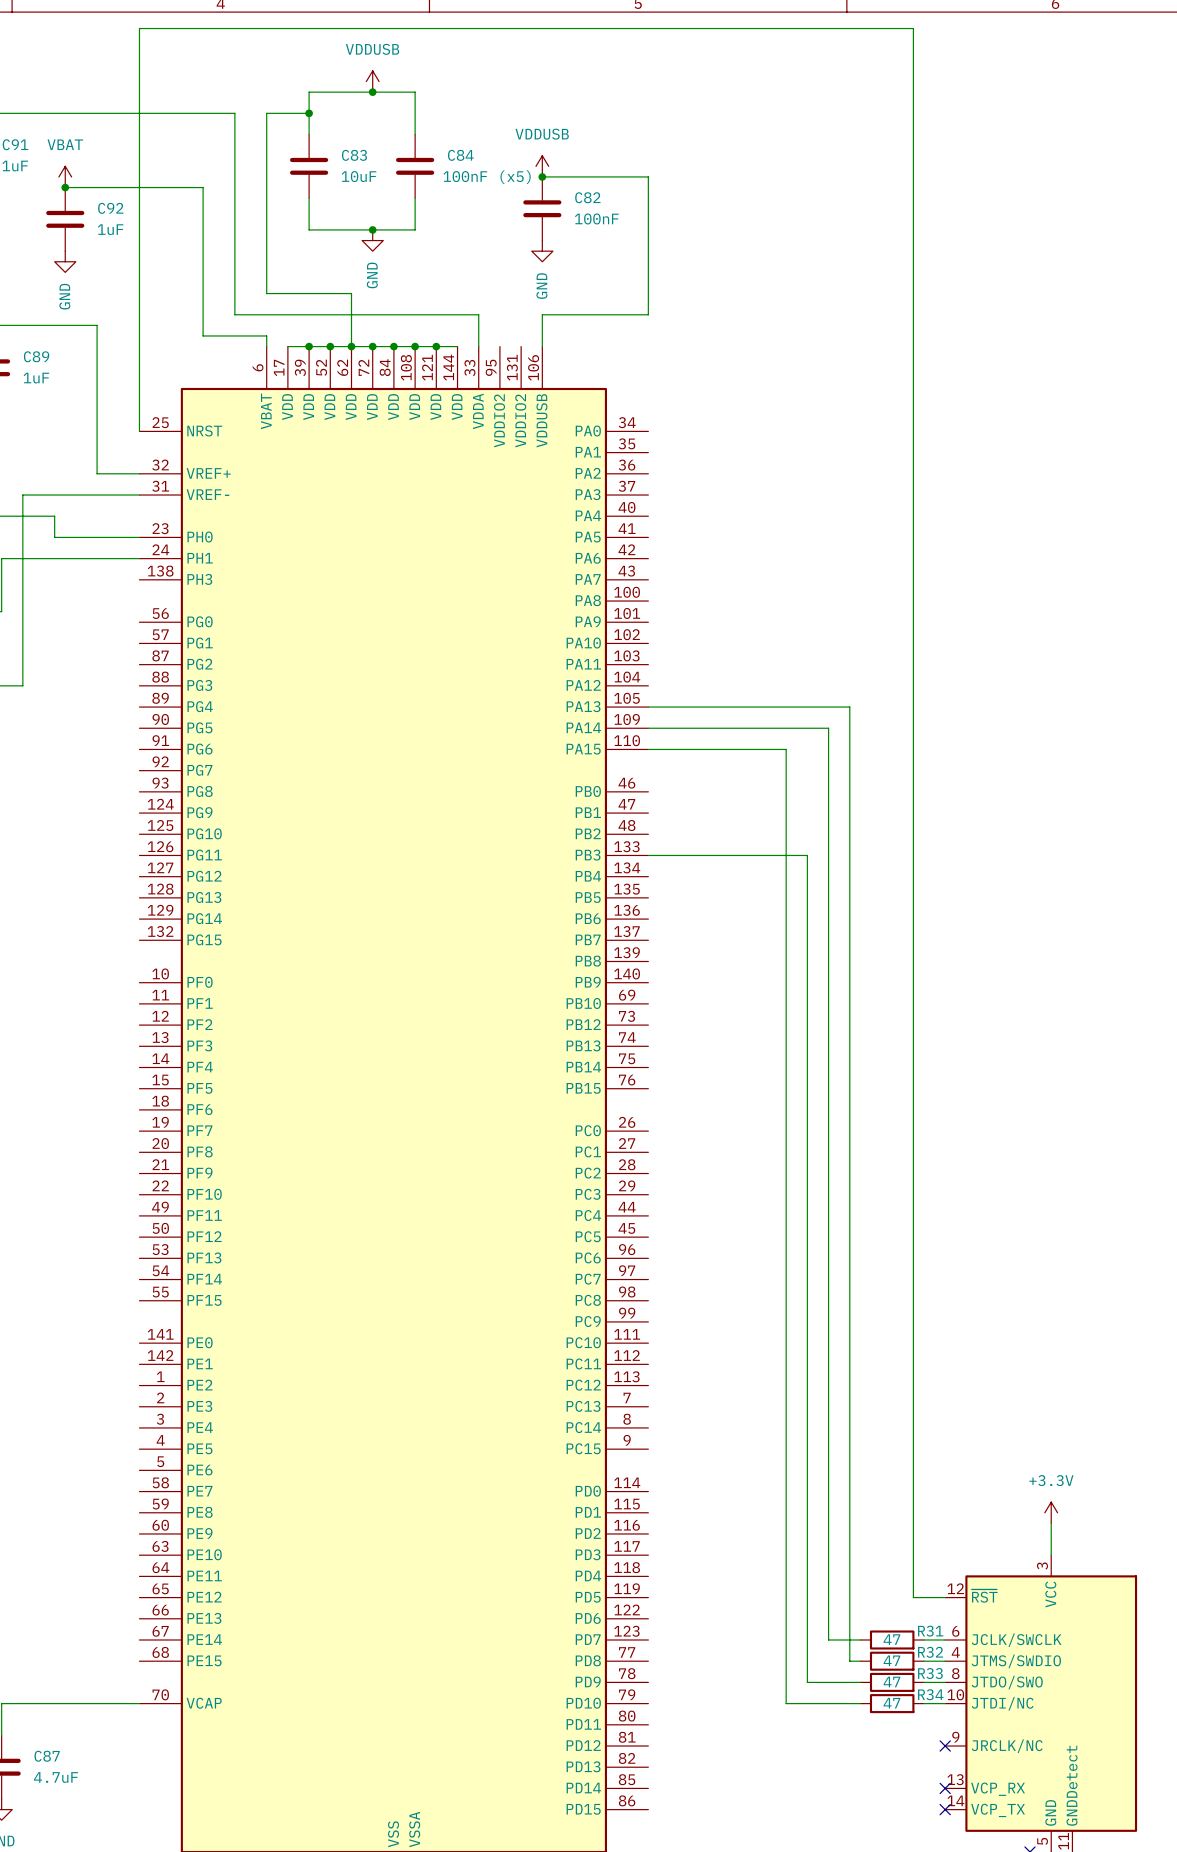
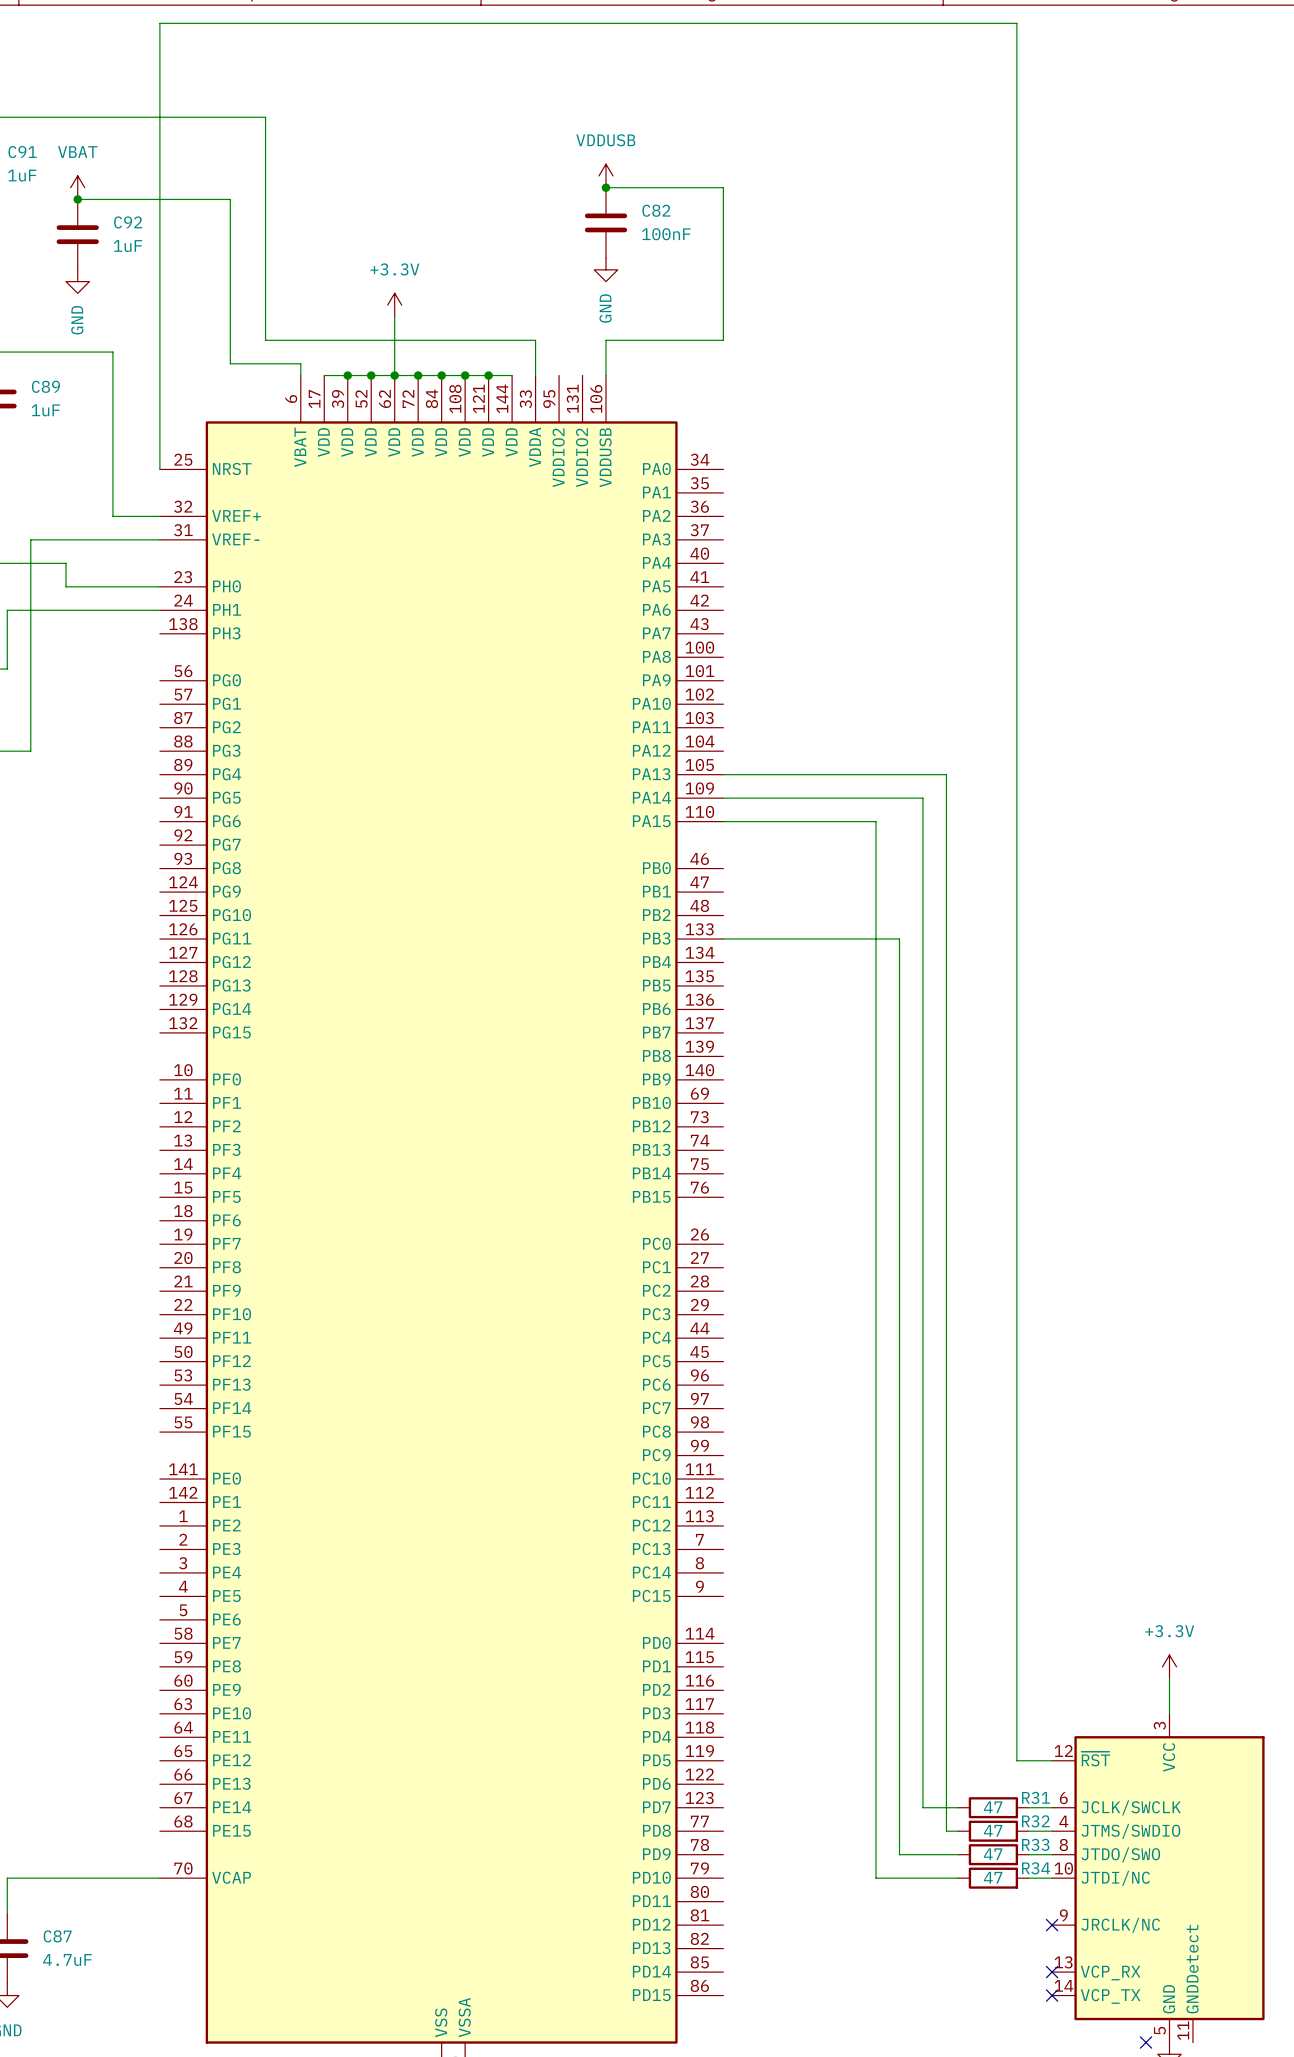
power symbol: VDDUSB (372, 81) -> none
junction: (372, 92) -> none
wire: (309, 113) (266, 113) (266, 293) (351, 293) -> none
junction: (309, 113) -> none
wire: (309, 134) (309, 92) (415, 92) (415, 134) -> none
C83: 10uF (309, 166) -> none
C84: 100nF (x5) (415, 166) -> none
wire: (309, 198) (309, 229) (415, 229) (415, 198) -> none
junction: (372, 229) -> none
power symbol: GND (372, 240) -> none
power symbol: none -> +3.3V (394, 305)

